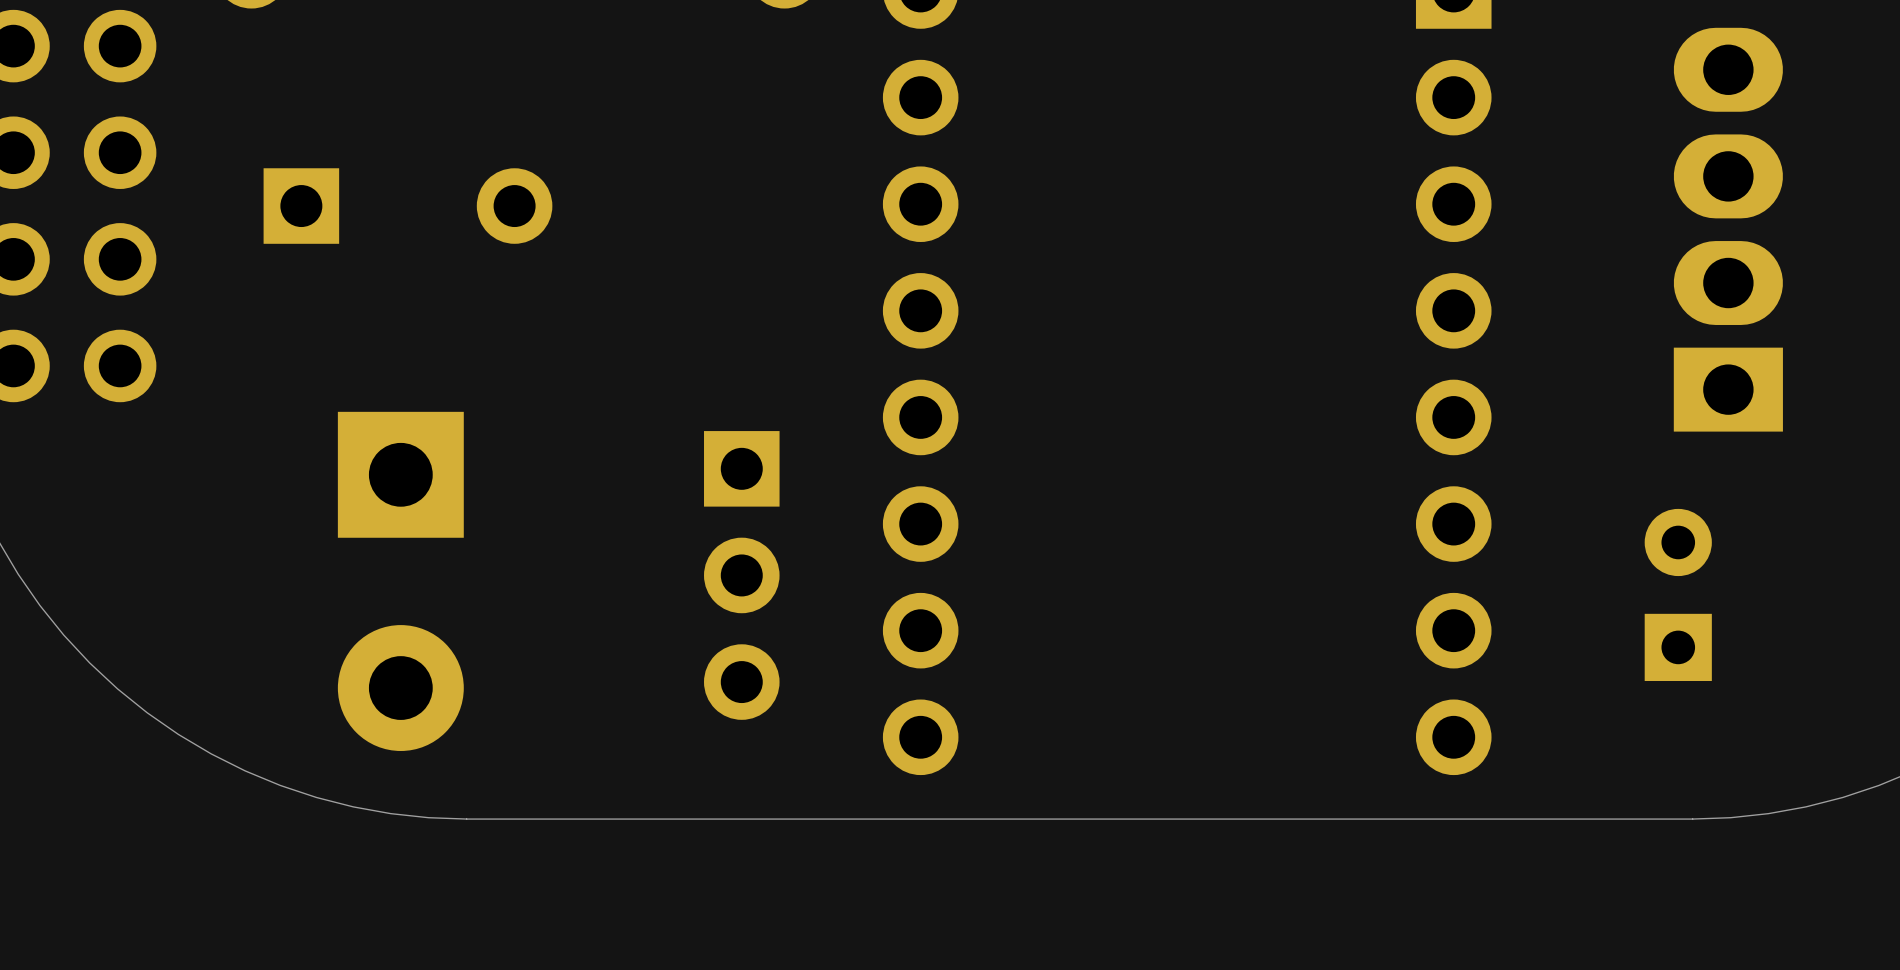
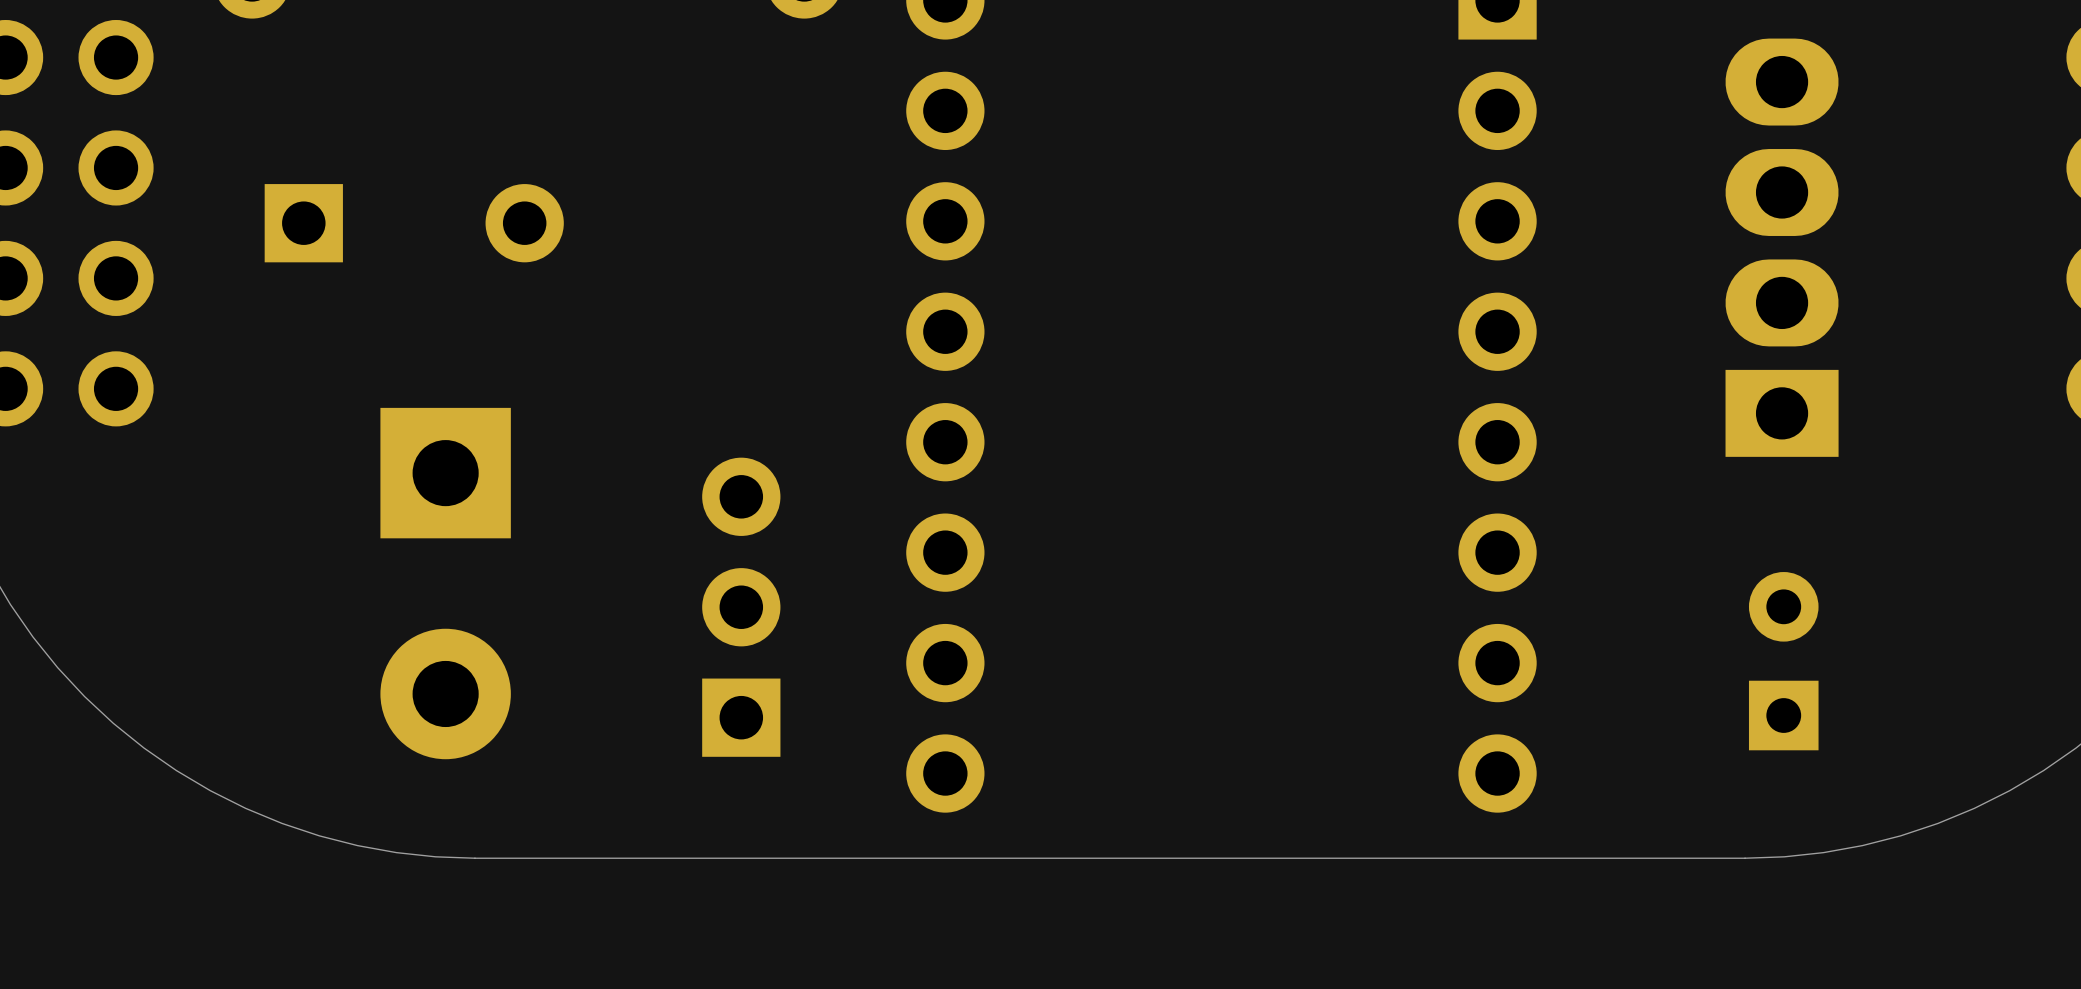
part rotation: 0° (741, 575) -> 180° (741, 607)
part position: (400, 581) -> (445, 583)
part position: (1678, 594) -> (1783, 661)

